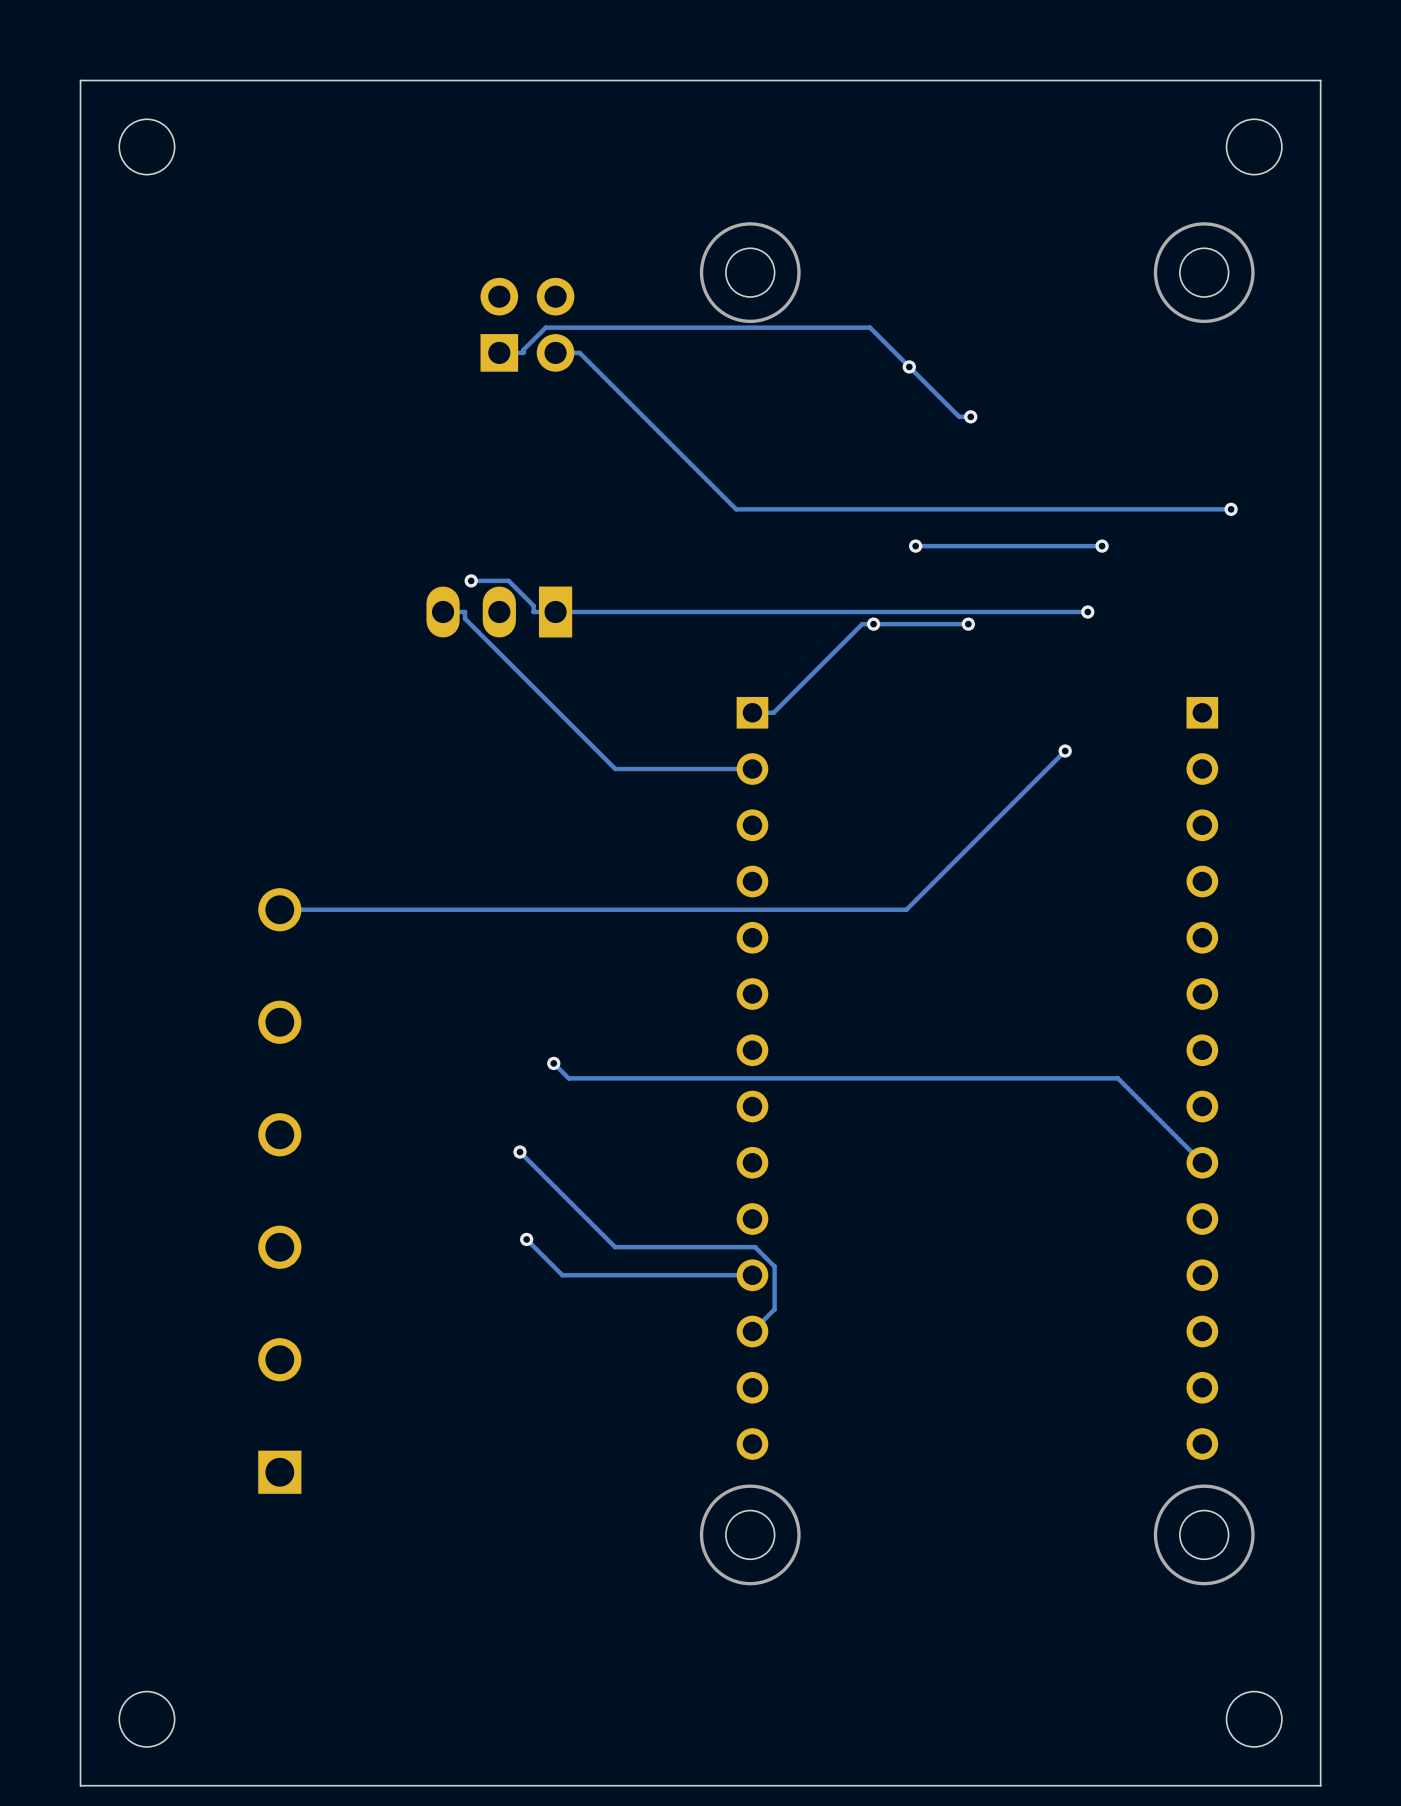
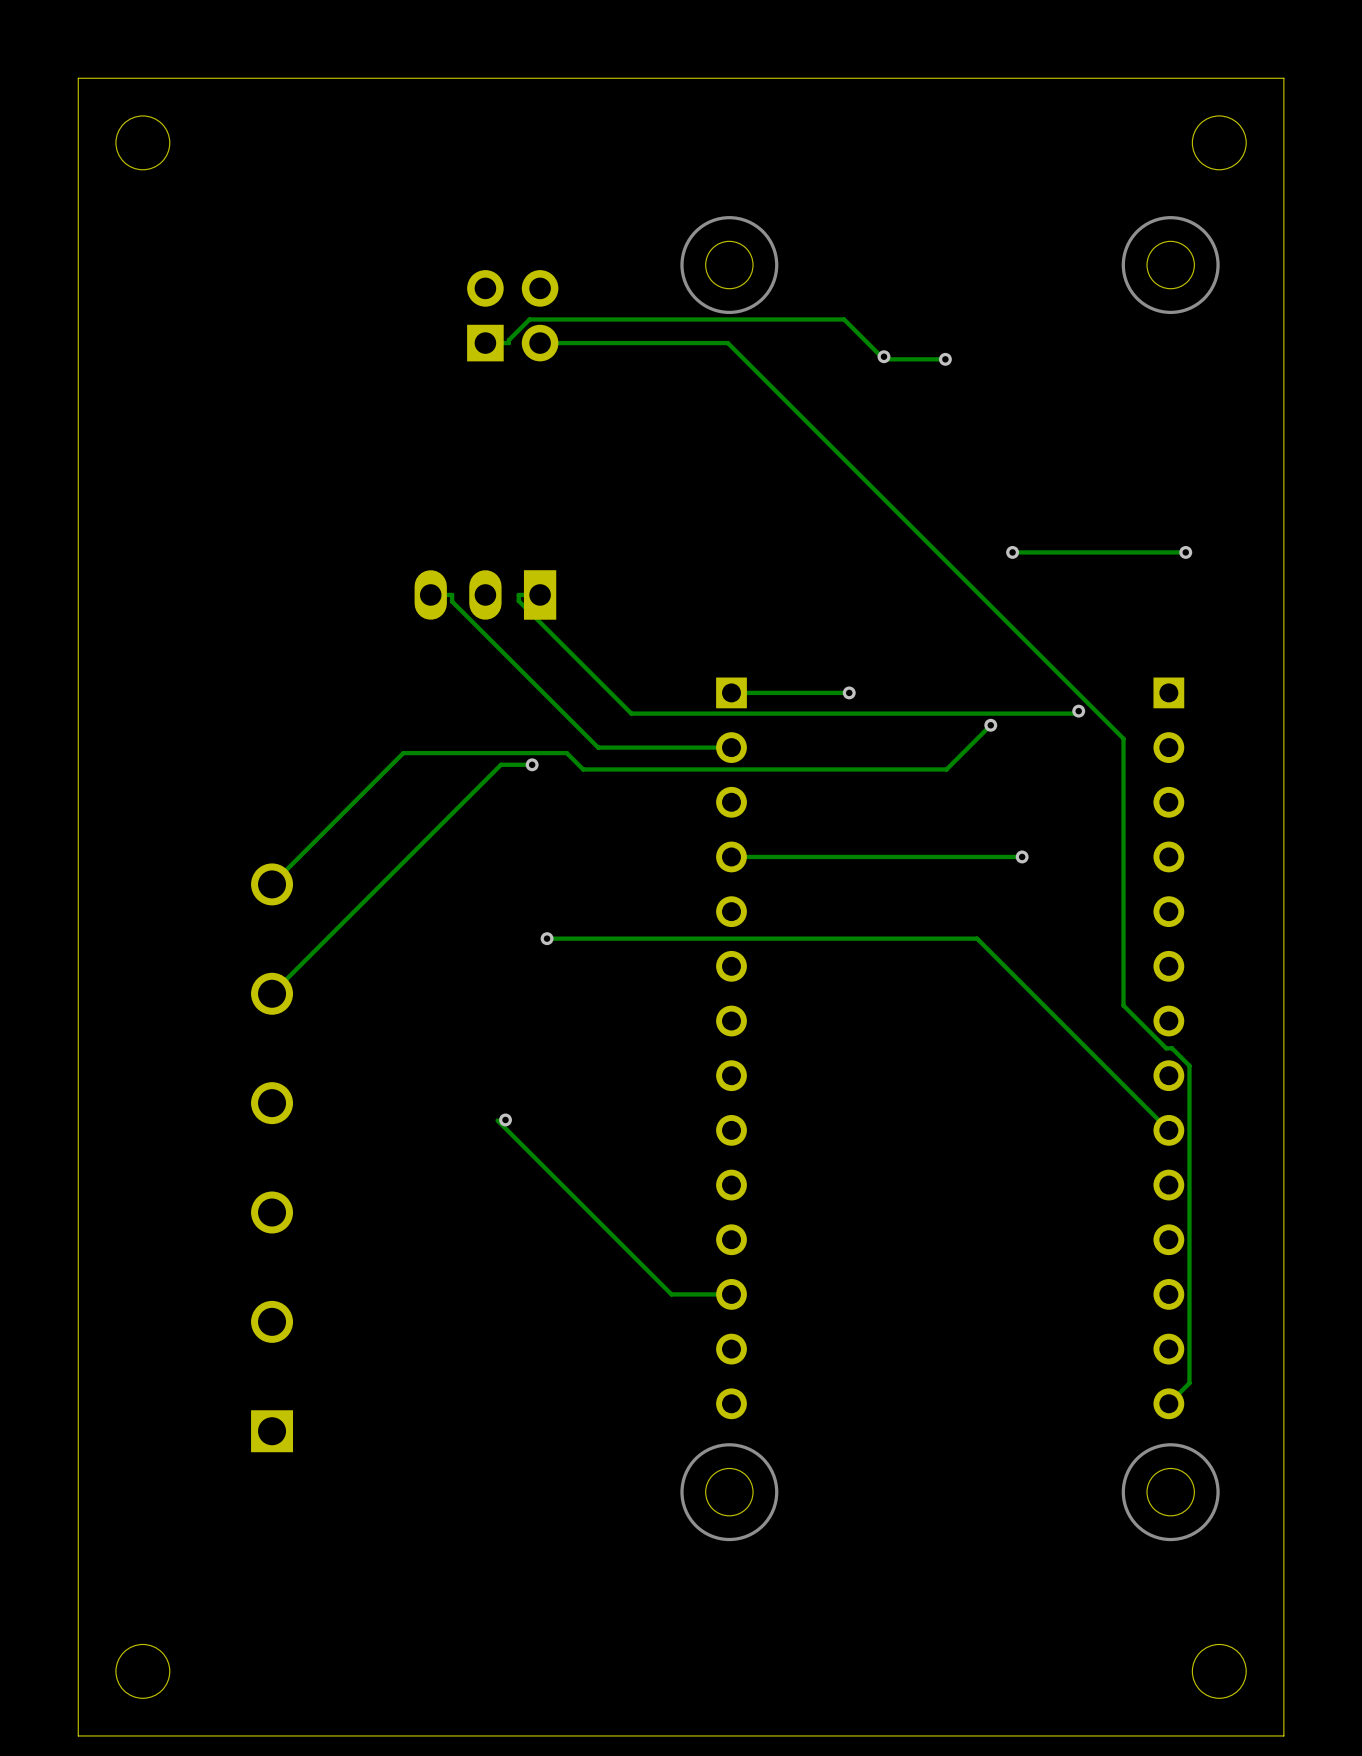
track: (544, 328) (870, 327) (959, 416) (970, 416) -> (529, 319) (844, 319) (883, 359) (945, 359)
track: (579, 352) (736, 509) (1231, 509) -> (563, 343) (727, 343) (1123, 738) (1123, 1005) (1166, 1048) (1172, 1048) (1189, 1065) (1189, 1383) (1168, 1403)
via position: (970, 416) -> (945, 359)
via: (1231, 509) -> none
via: (915, 546) -> none
track: (1102, 546) (915, 546) -> none
via: (1102, 546) -> none
via: none -> (1012, 552)
track: none -> (1185, 552) (1012, 552)
via: none -> (1185, 552)
track: (471, 580) (508, 580) (533, 605) (533, 612) -> (1078, 711) (1076, 713) (631, 713) (518, 600) (518, 594)
via: (471, 580) -> none
track: (1087, 612) (555, 612) -> none
via: (1087, 612) -> none
via: (873, 624) -> none
track: (968, 624) (862, 624) (773, 712) -> (849, 692) (752, 692)
via: (968, 624) -> none
via: none -> (849, 692)
via: none -> (1078, 711)
via: none -> (990, 725)
track: (1065, 751) (906, 909) (279, 909) -> (990, 725) (946, 769) (583, 769) (566, 753) (403, 753) (272, 884)
via: (1065, 751) -> none
track: none -> (532, 764) (501, 764) (272, 993)
via: none -> (532, 764)
track: none -> (1022, 856) (731, 856)
via: none -> (1022, 856)
track: (553, 1063) (568, 1078) (1117, 1078) -> (547, 938) (977, 938) (1086, 1048)
via position: (553, 1063) -> (547, 938)
track: (519, 1152) (615, 1247) (755, 1247) (774, 1266) (774, 1309) (752, 1331) -> (497, 1120) (671, 1294) (731, 1294)
track: (526, 1239) (562, 1275) (752, 1275) -> none
via: (526, 1239) -> none

